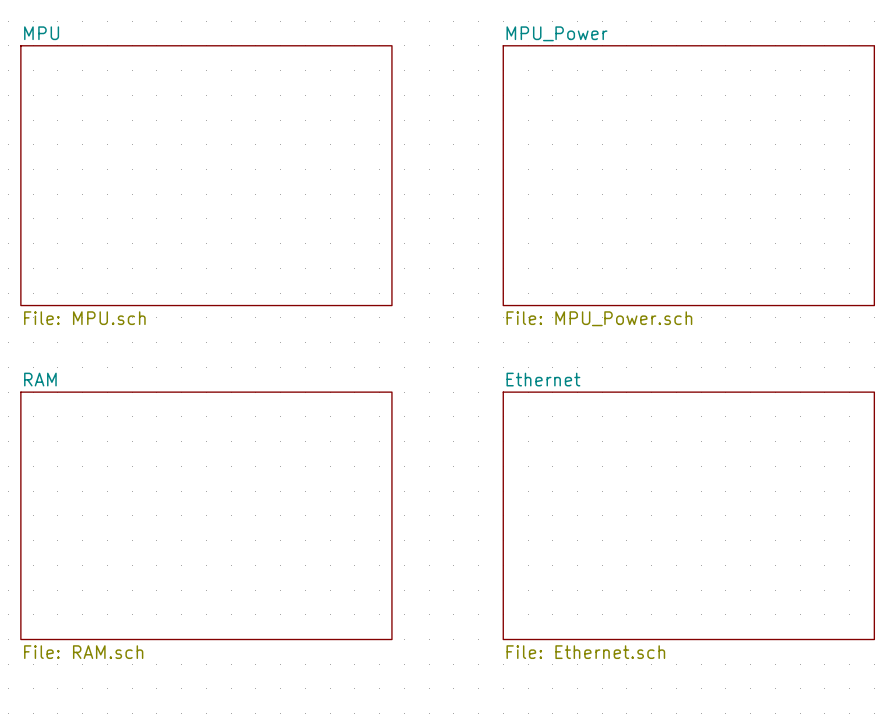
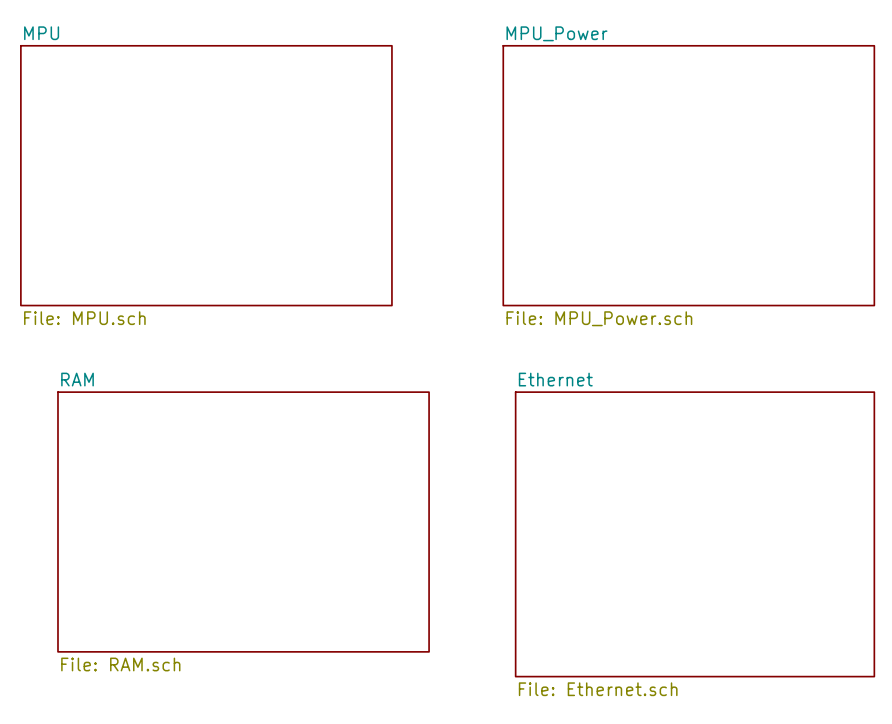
sheet RAM: File: RAM.sch (206, 515) -> none
sheet Ethernet: File: Ethernet.sch (688, 515) -> none
sheet RAM: none -> File: RAM.sch (243, 522)
sheet Ethernet: none -> File: Ethernet.sch (694, 534)

